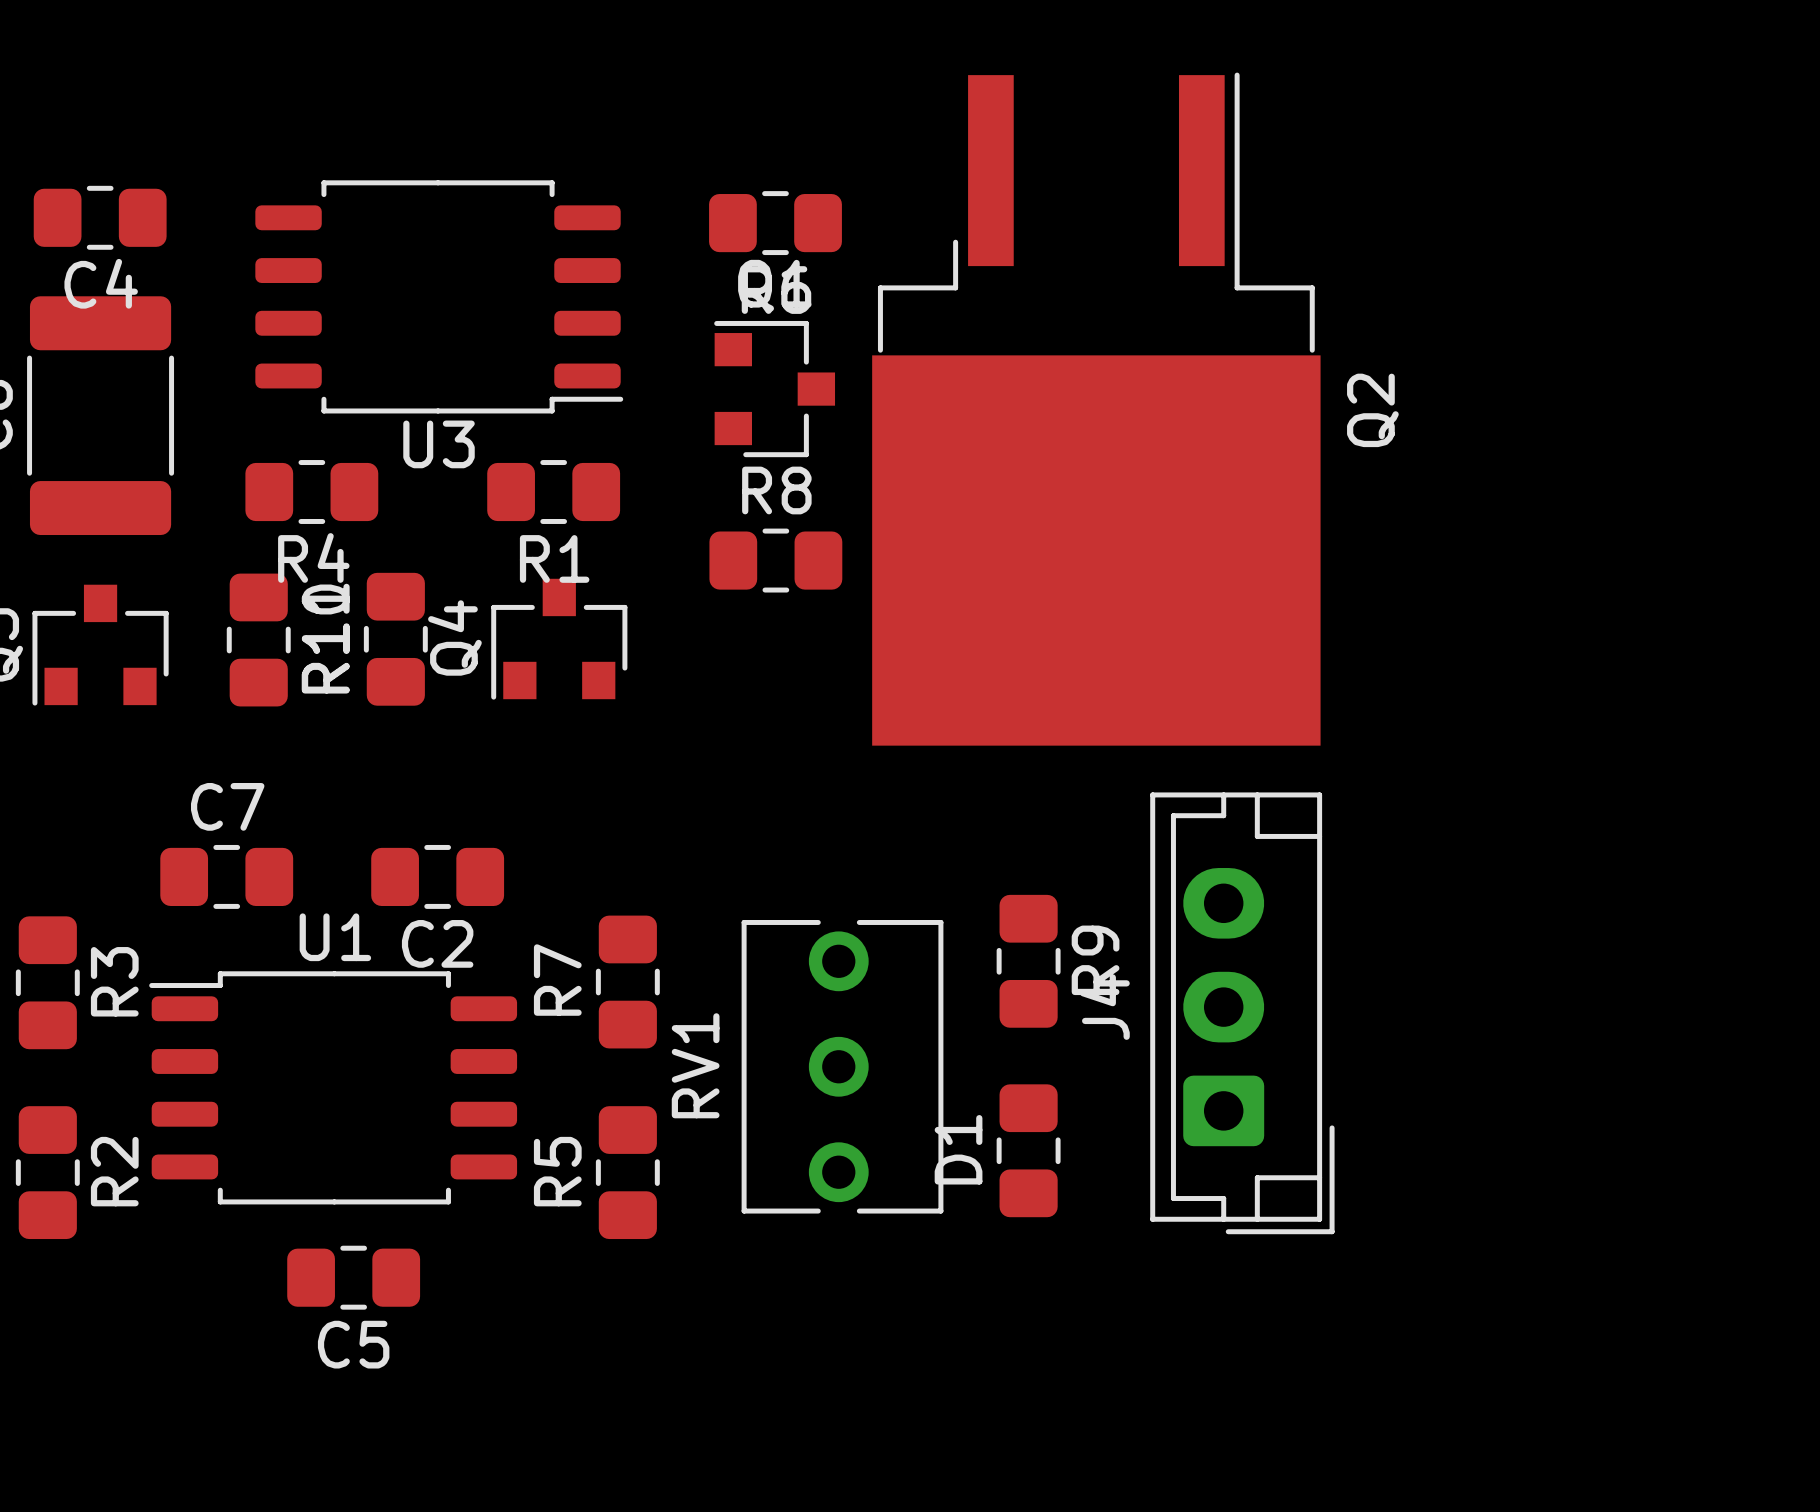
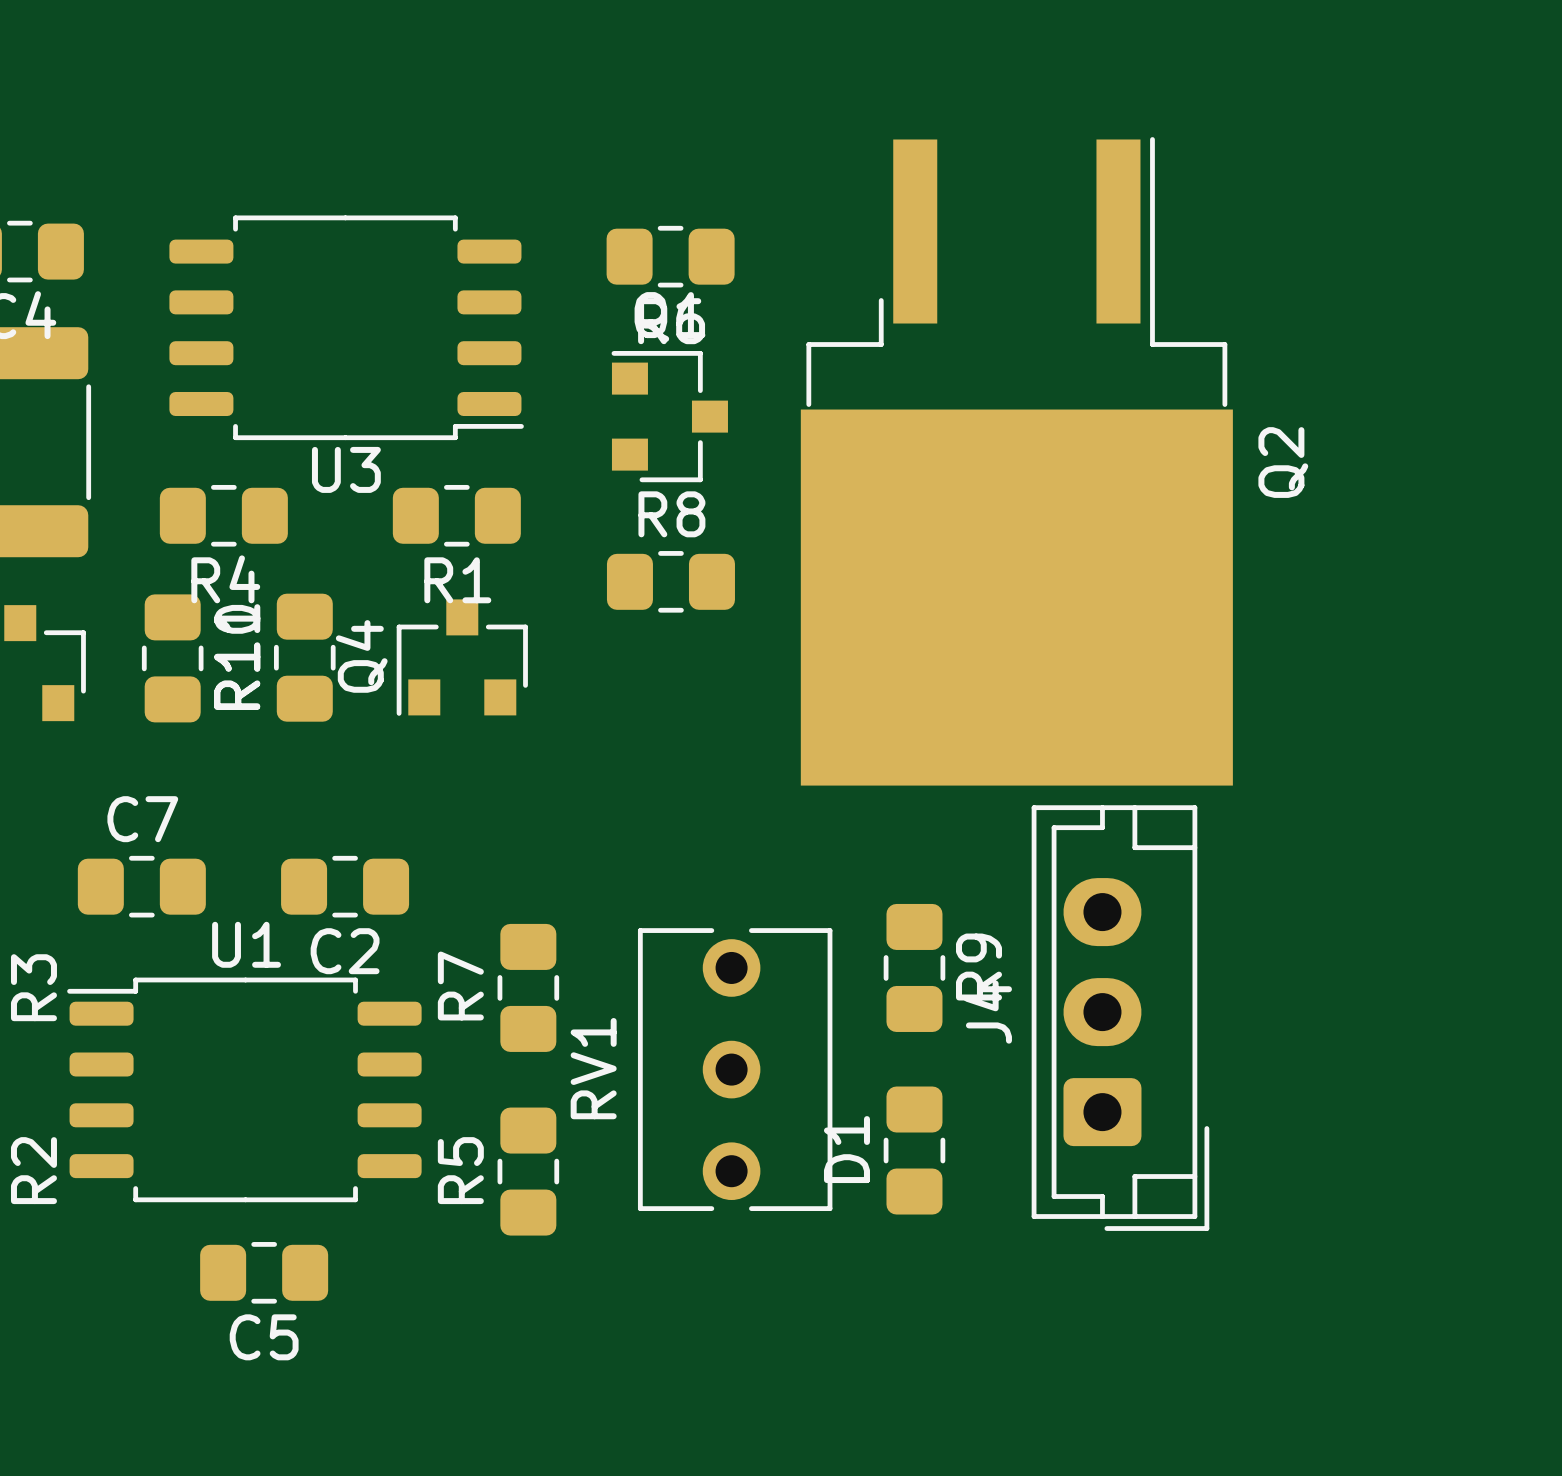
Q2 position: (1096, 409) -> (1016, 461)

